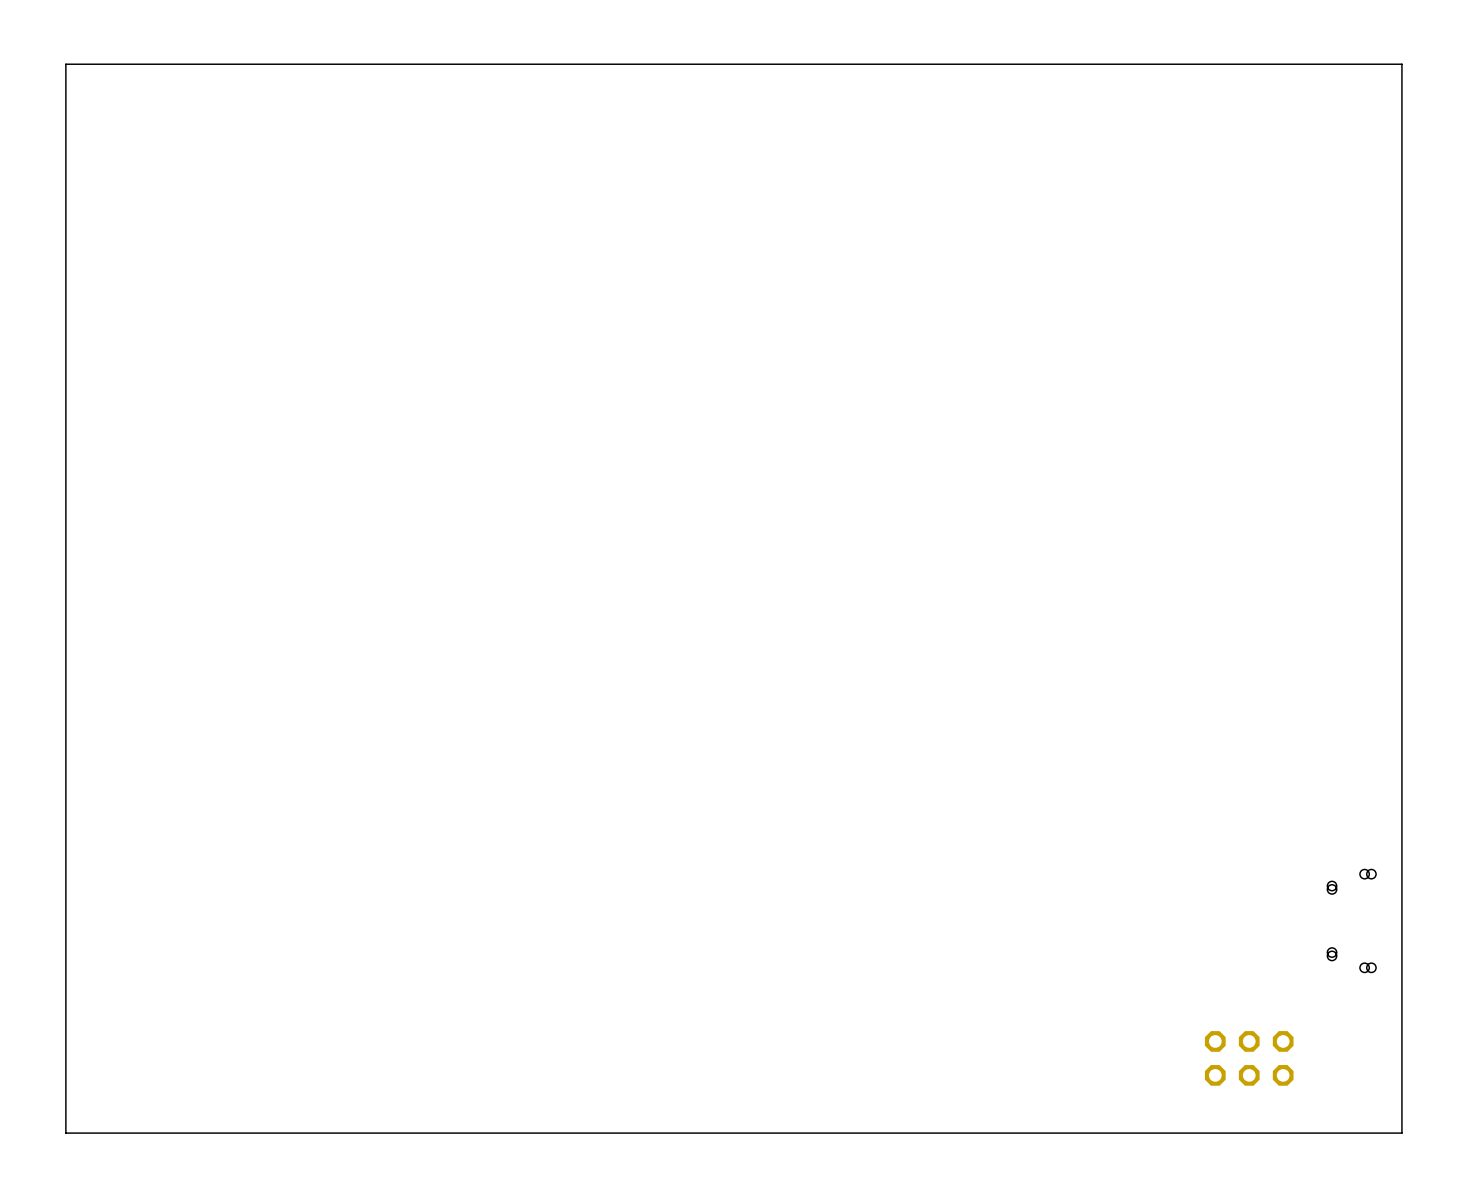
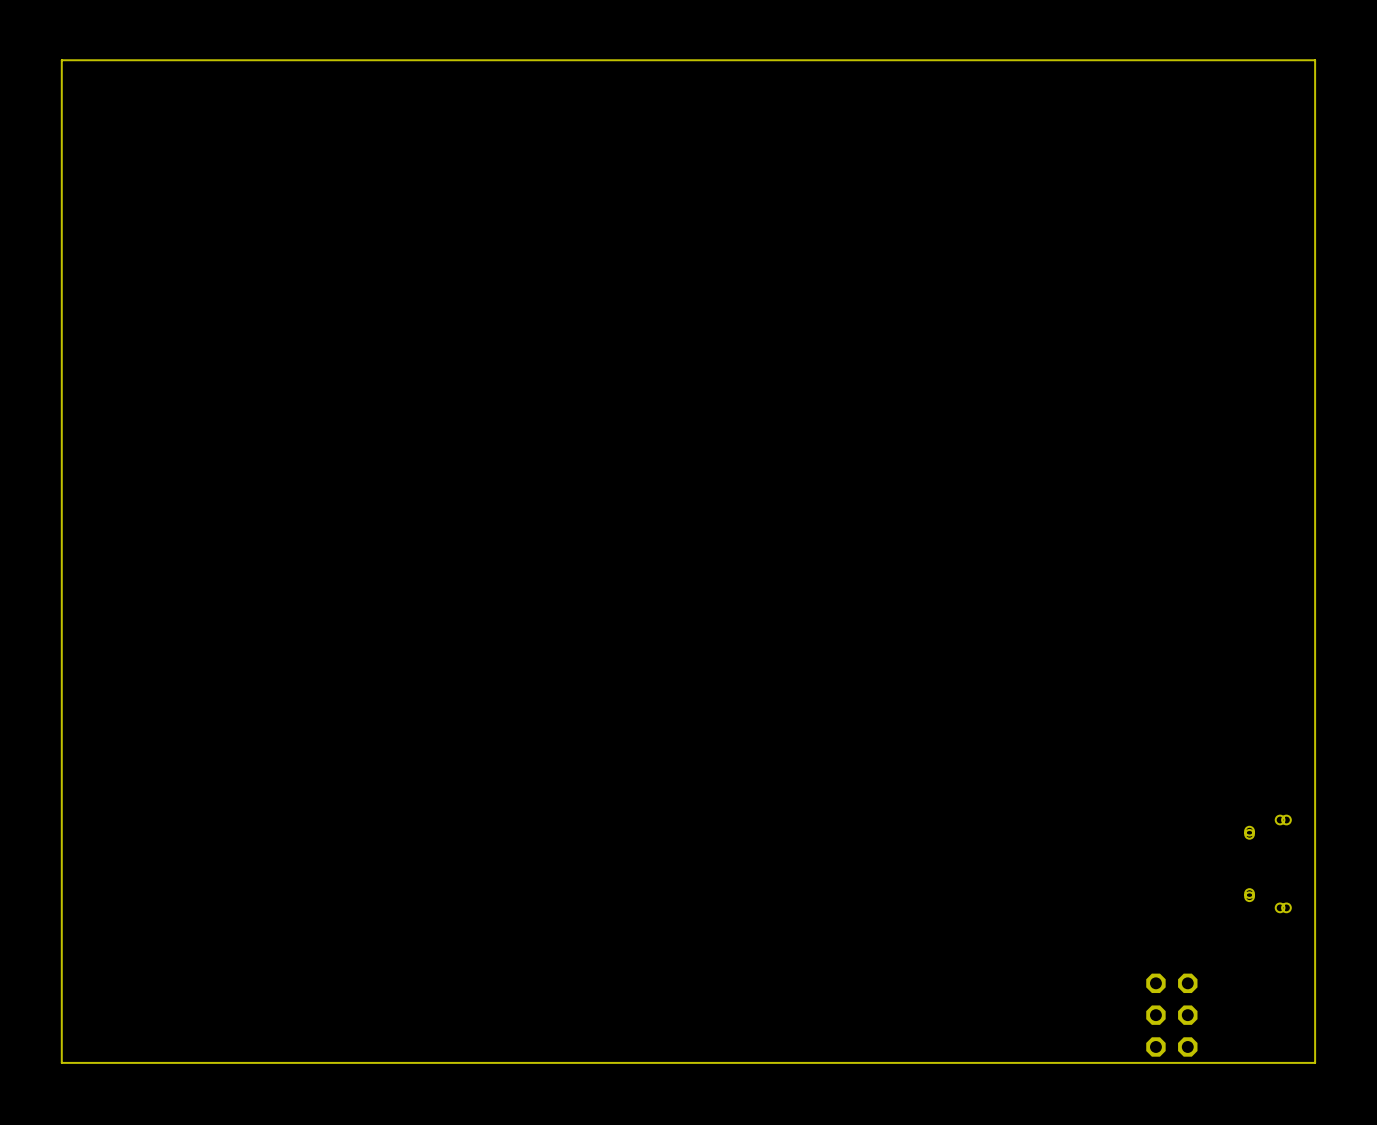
part rotation: 0° (1249, 1058) -> 90° clockwise (1171, 1015)

